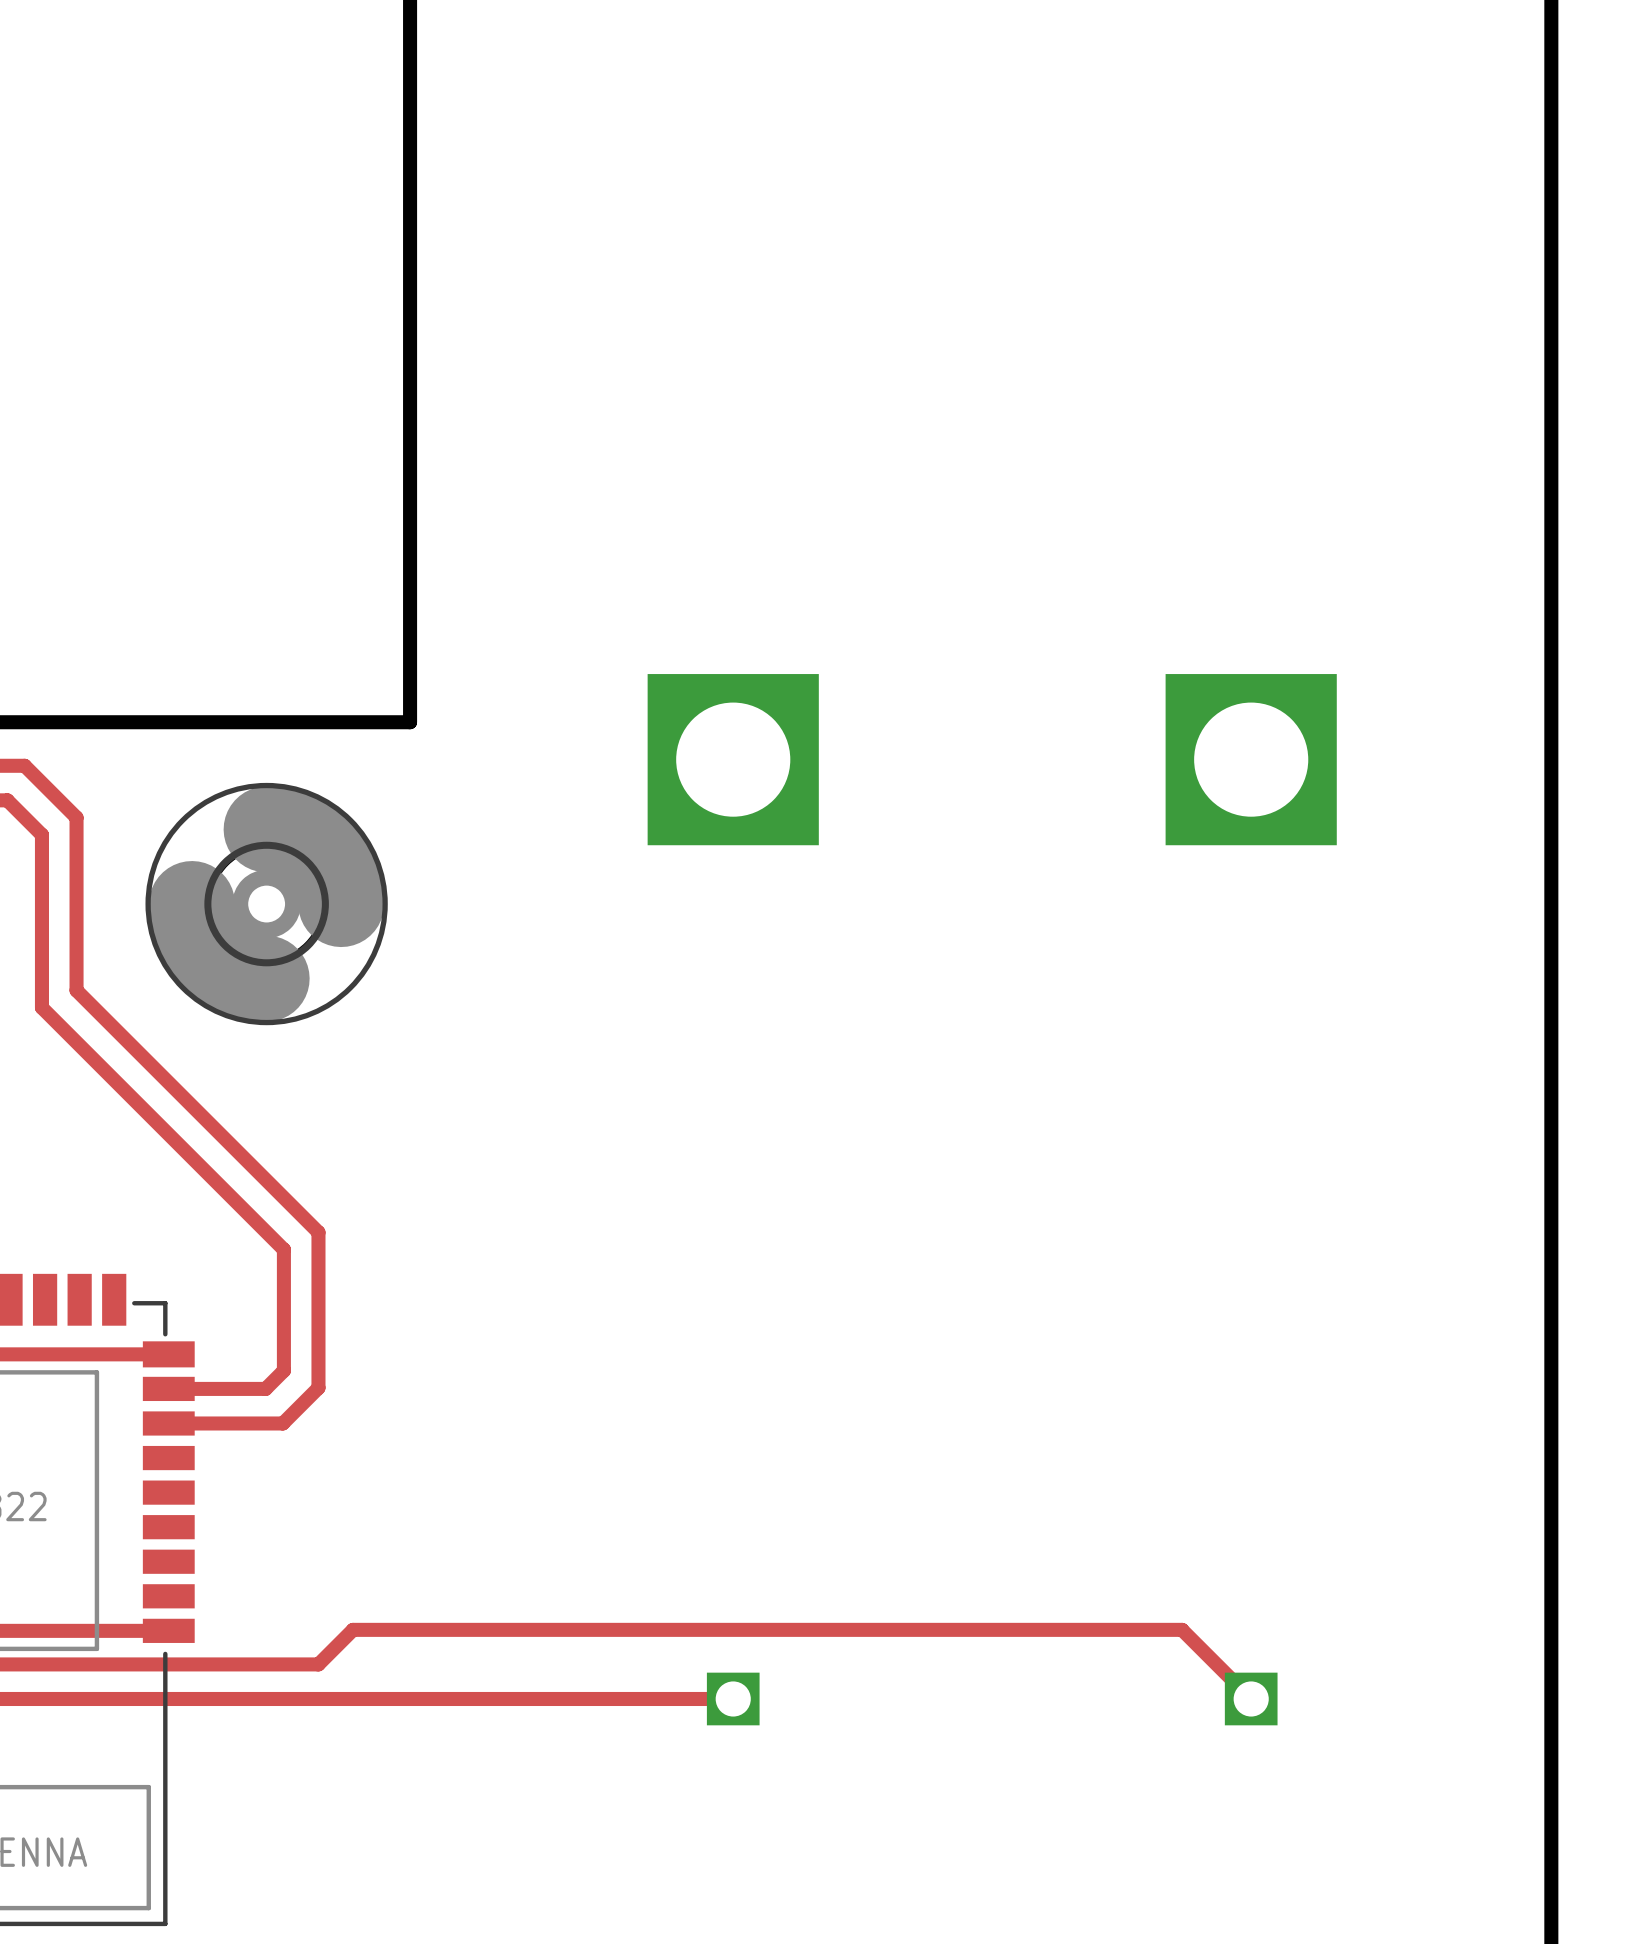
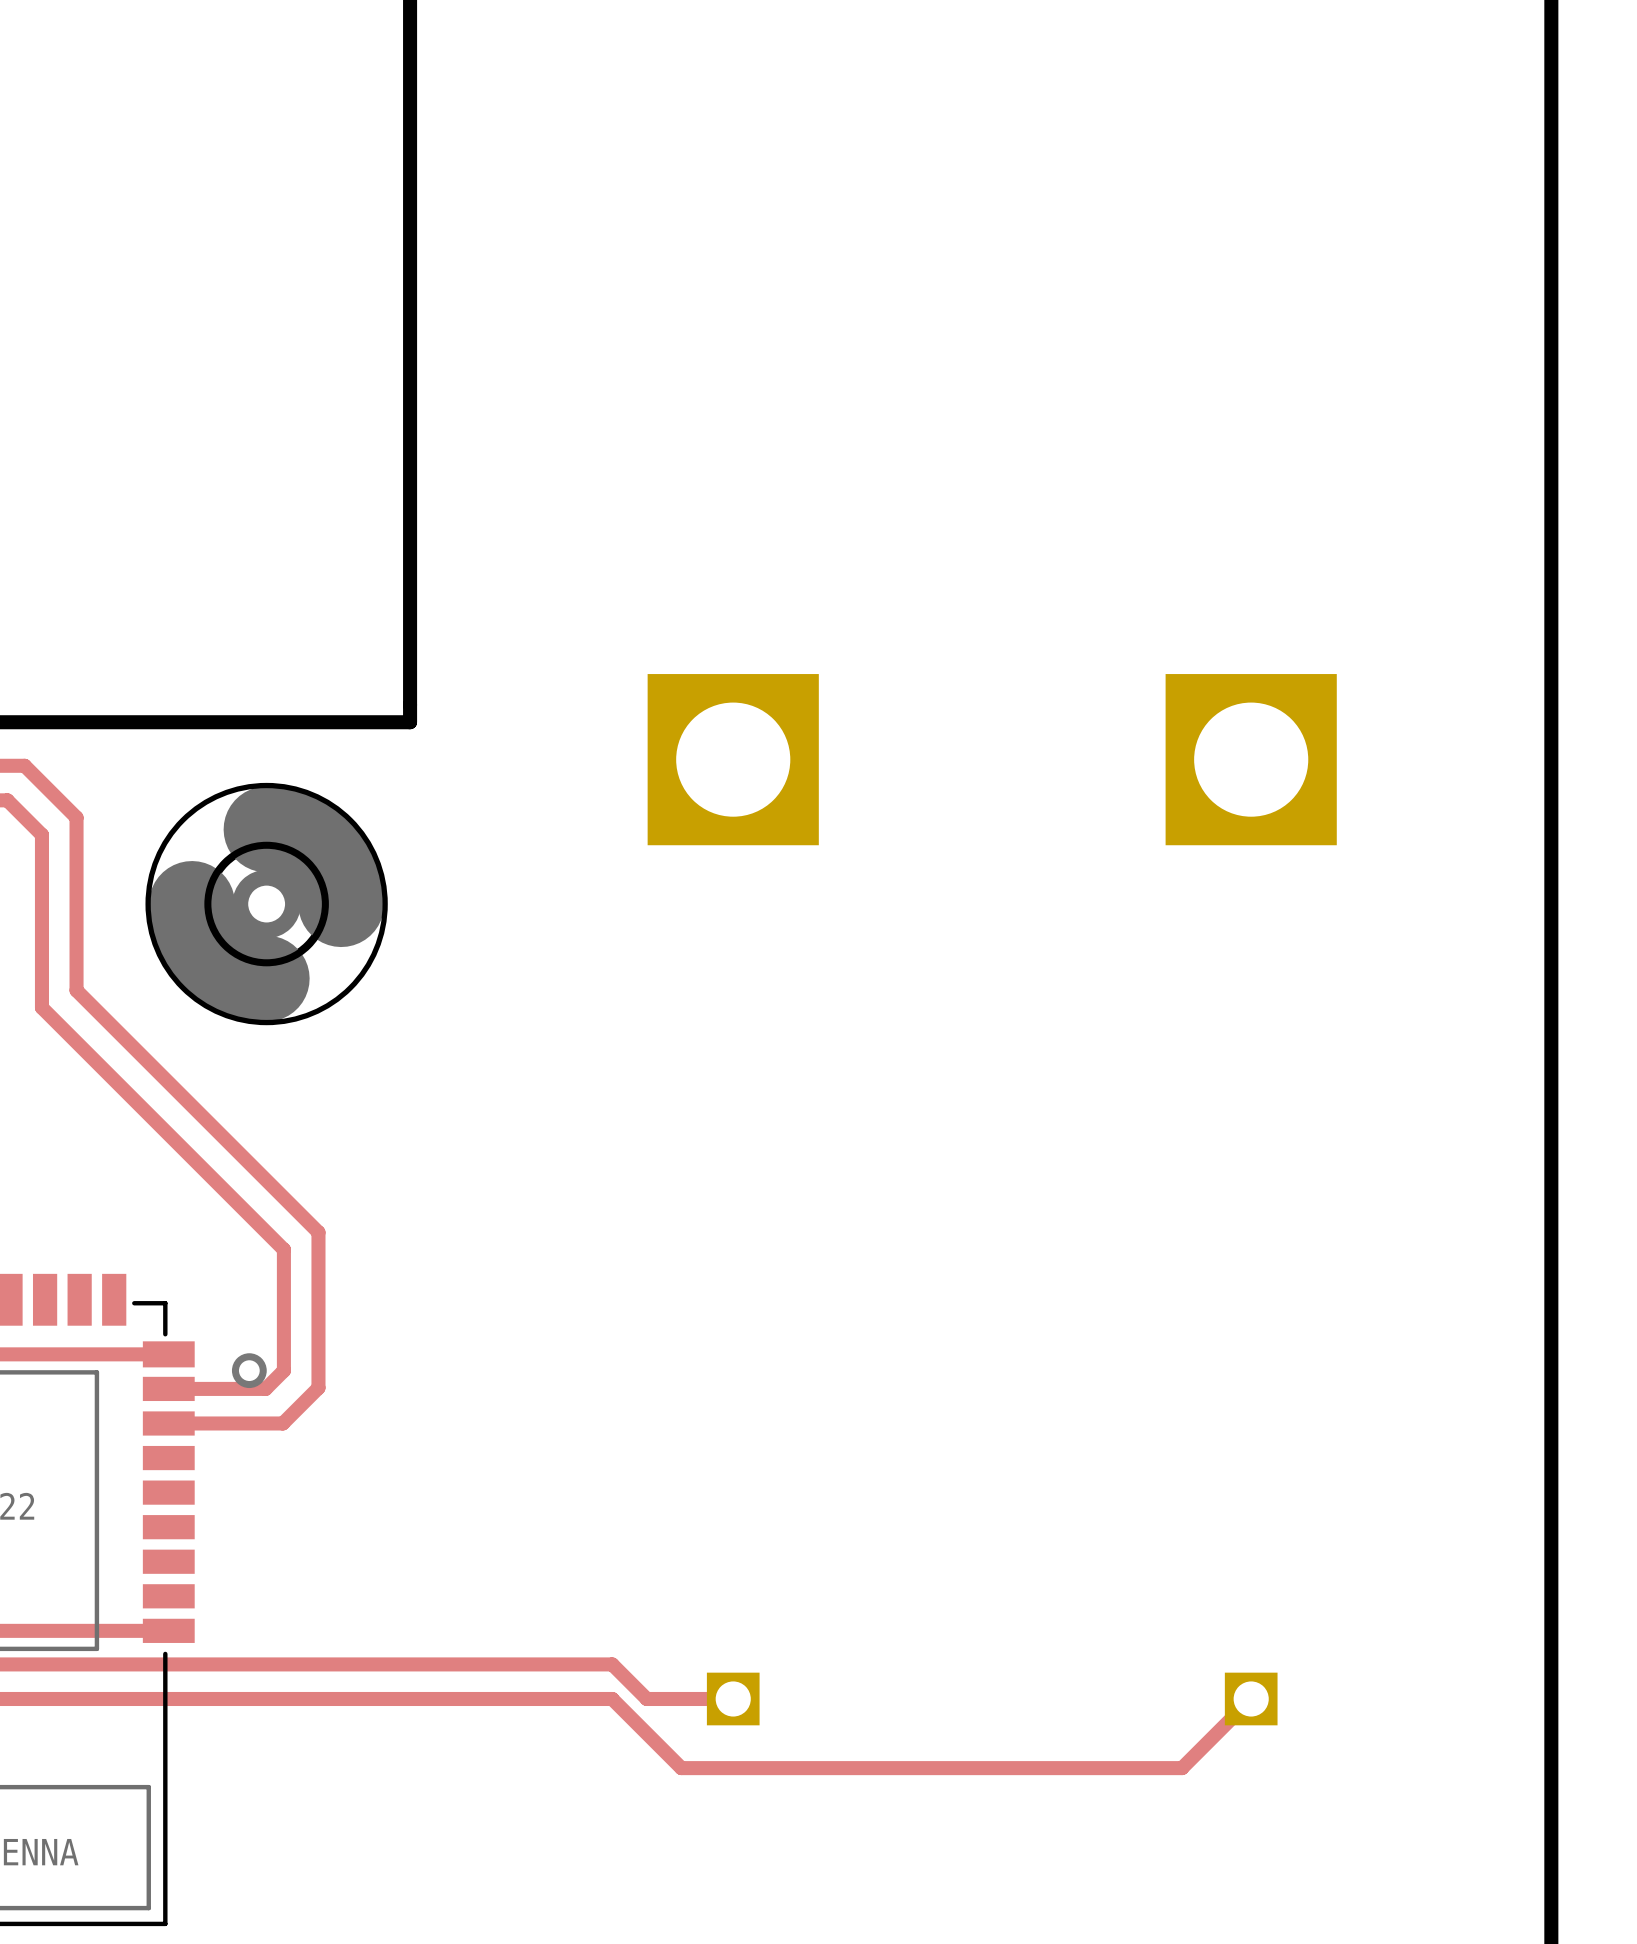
via: none -> (249, 1370)
top track: (318, 1664) (353, 1629) (1182, 1629) (1251, 1698) -> (612, 1698) (681, 1768) (1182, 1768) (1251, 1698)
top track: (612, 1698) (646, 1698) -> (318, 1664) (612, 1664) (646, 1698)

